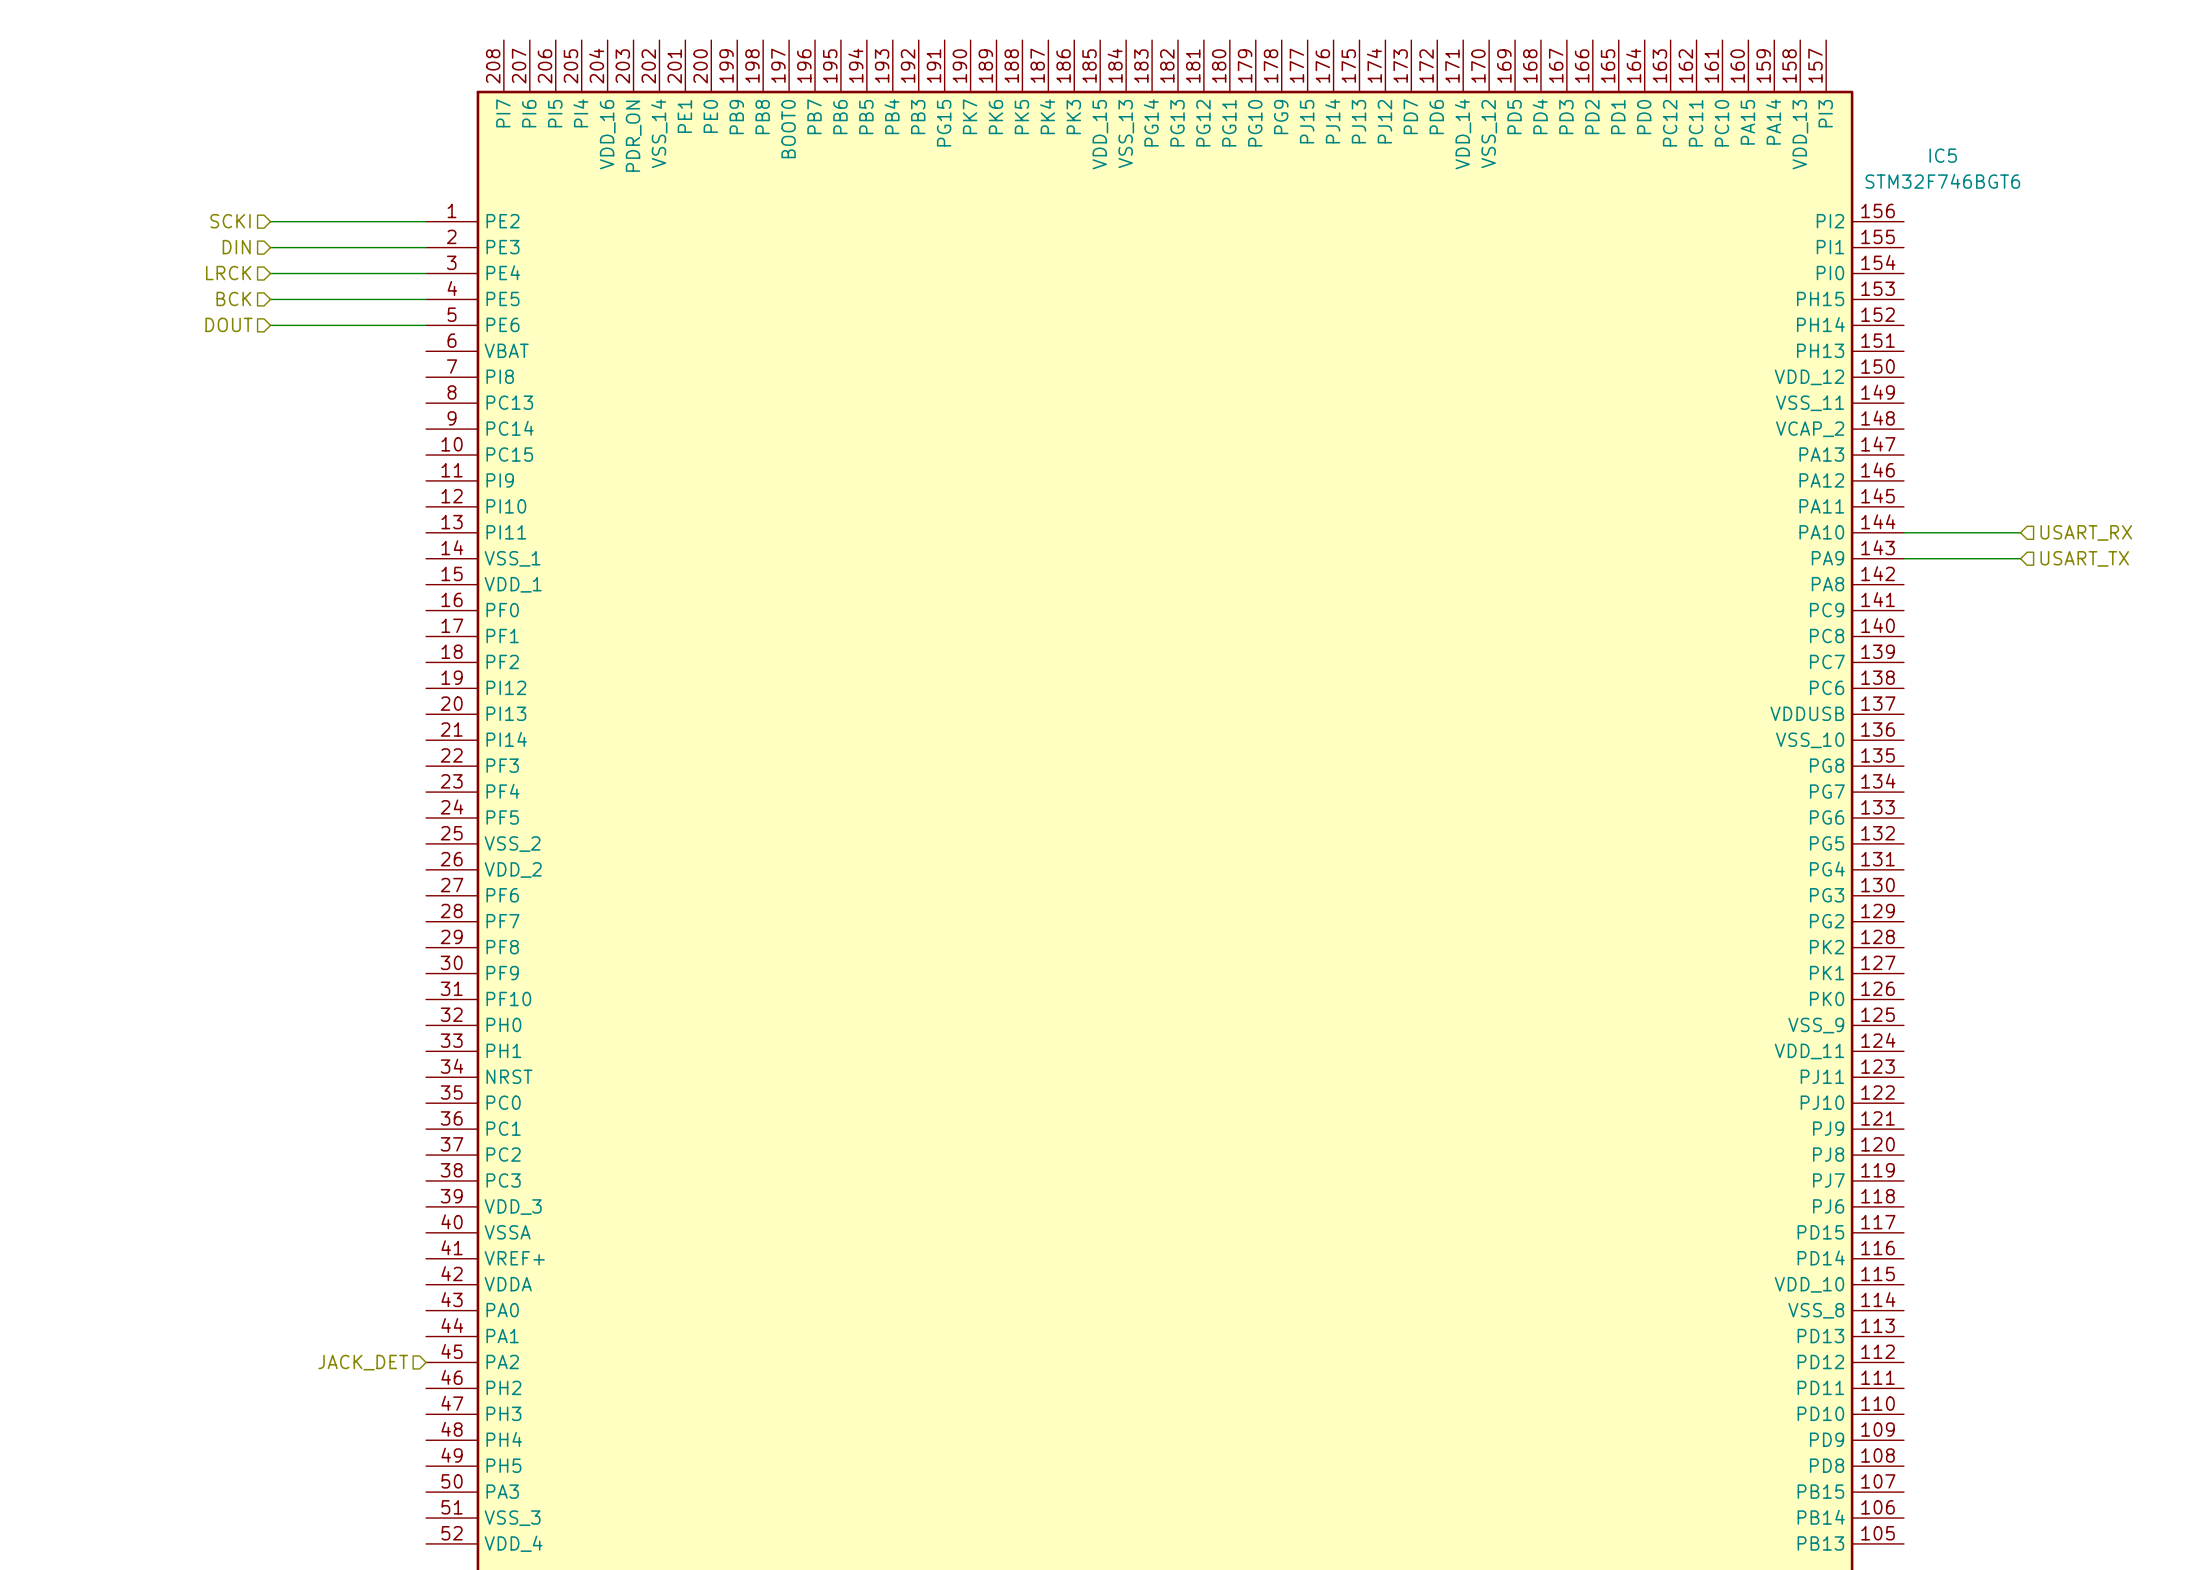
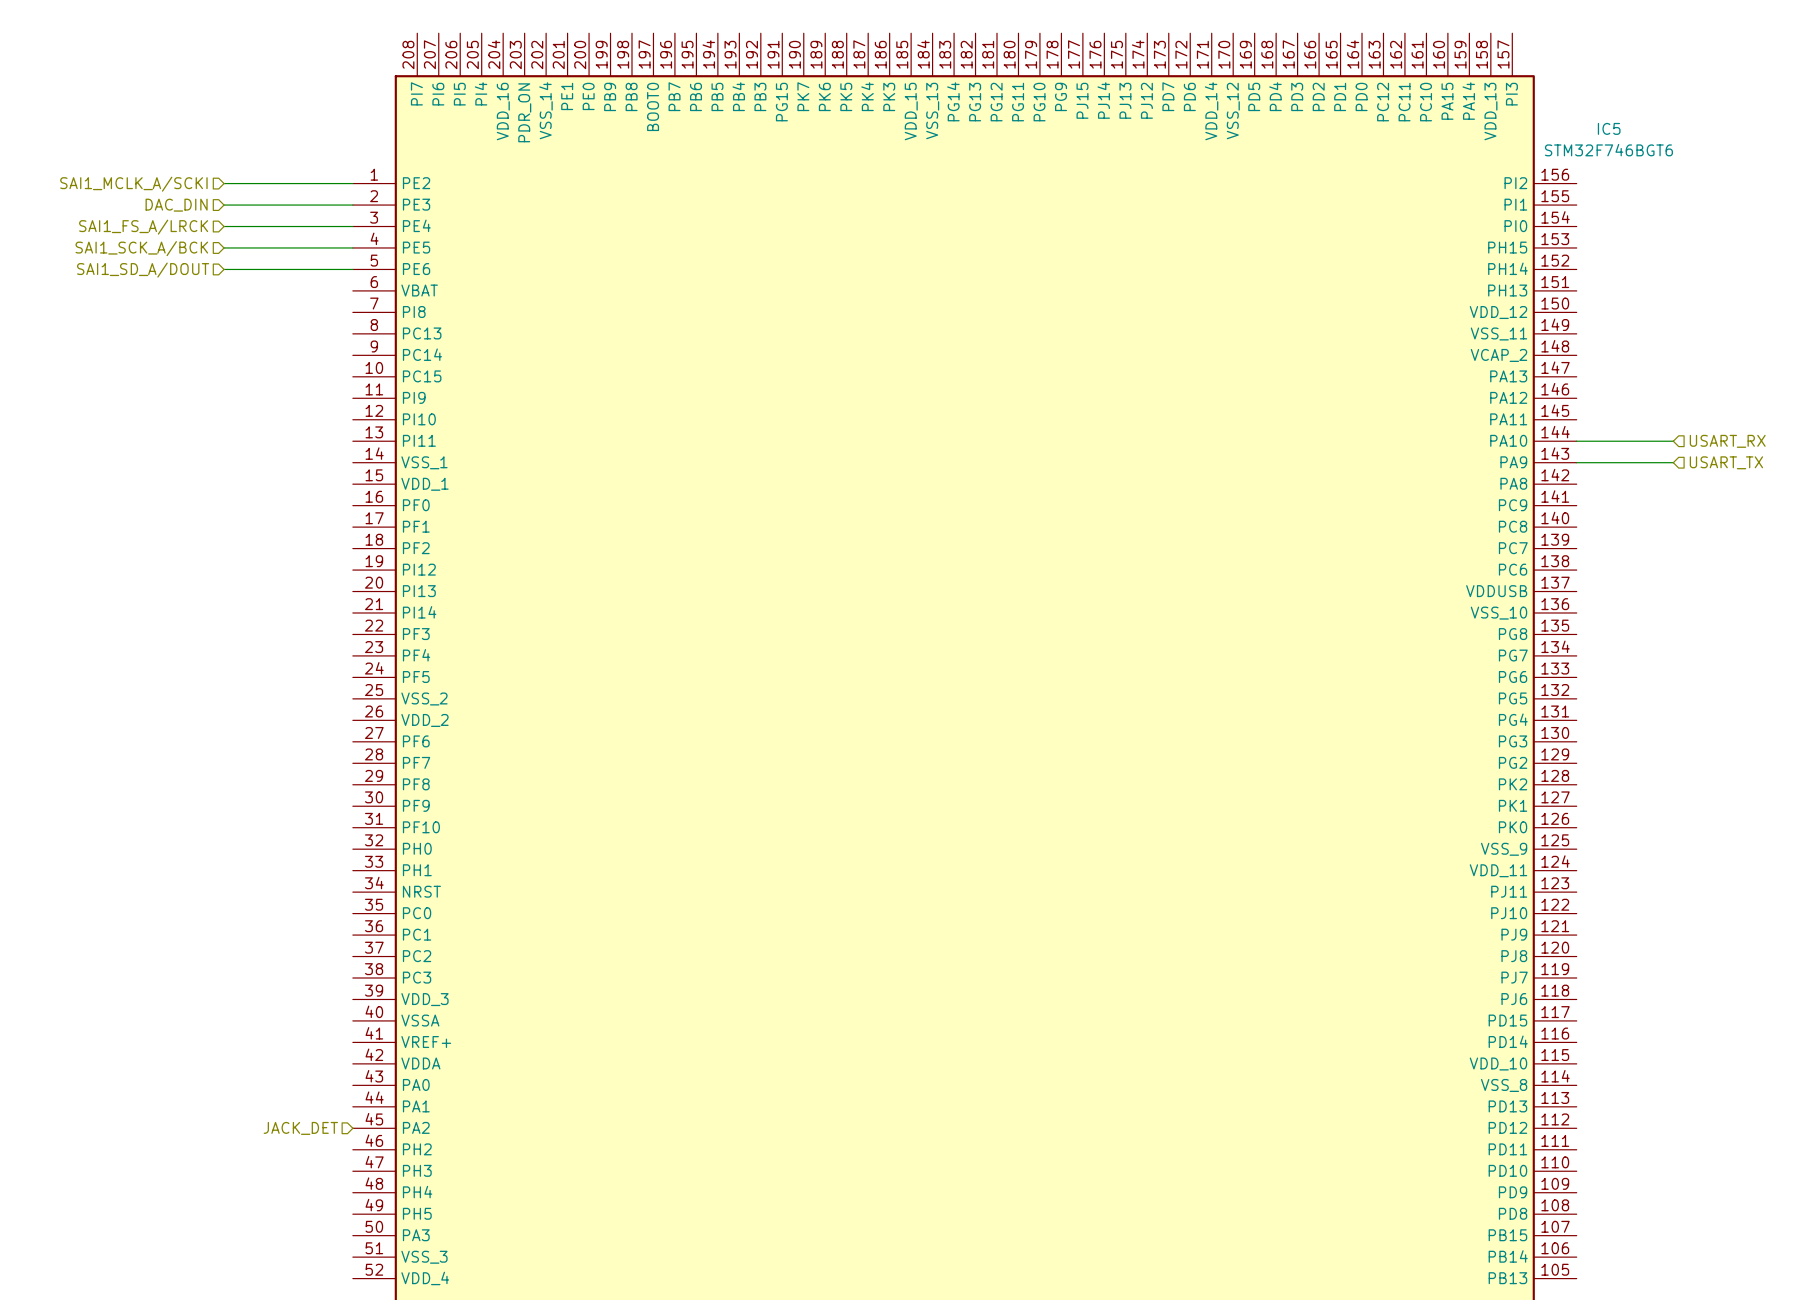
hierarchical label: SCKI (230, 221) -> SAI1_MCLK_A/SCKI (133, 184)
hierarchical label: DIN (236, 247) -> DAC_DIN (176, 205)
hierarchical label: LRCK (228, 273) -> SAI1_FS_A/LRCK (143, 227)
hierarchical label: BCK (233, 298) -> SAI1_SCK_A/BCK (141, 248)
hierarchical label: DOUT (228, 324) -> SAI1_SD_A/DOUT (143, 270)

